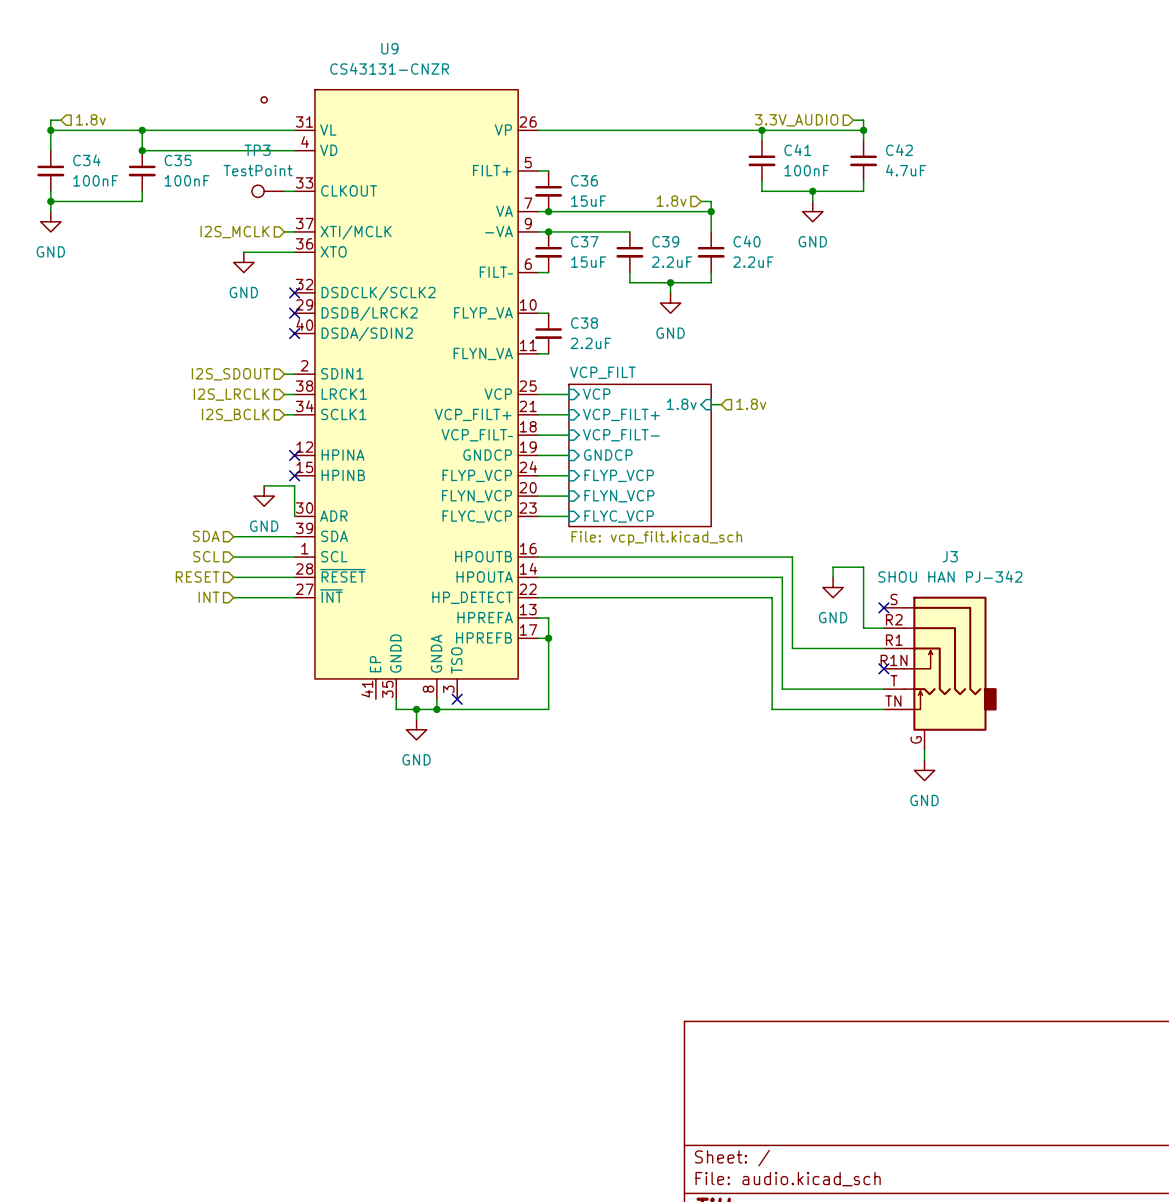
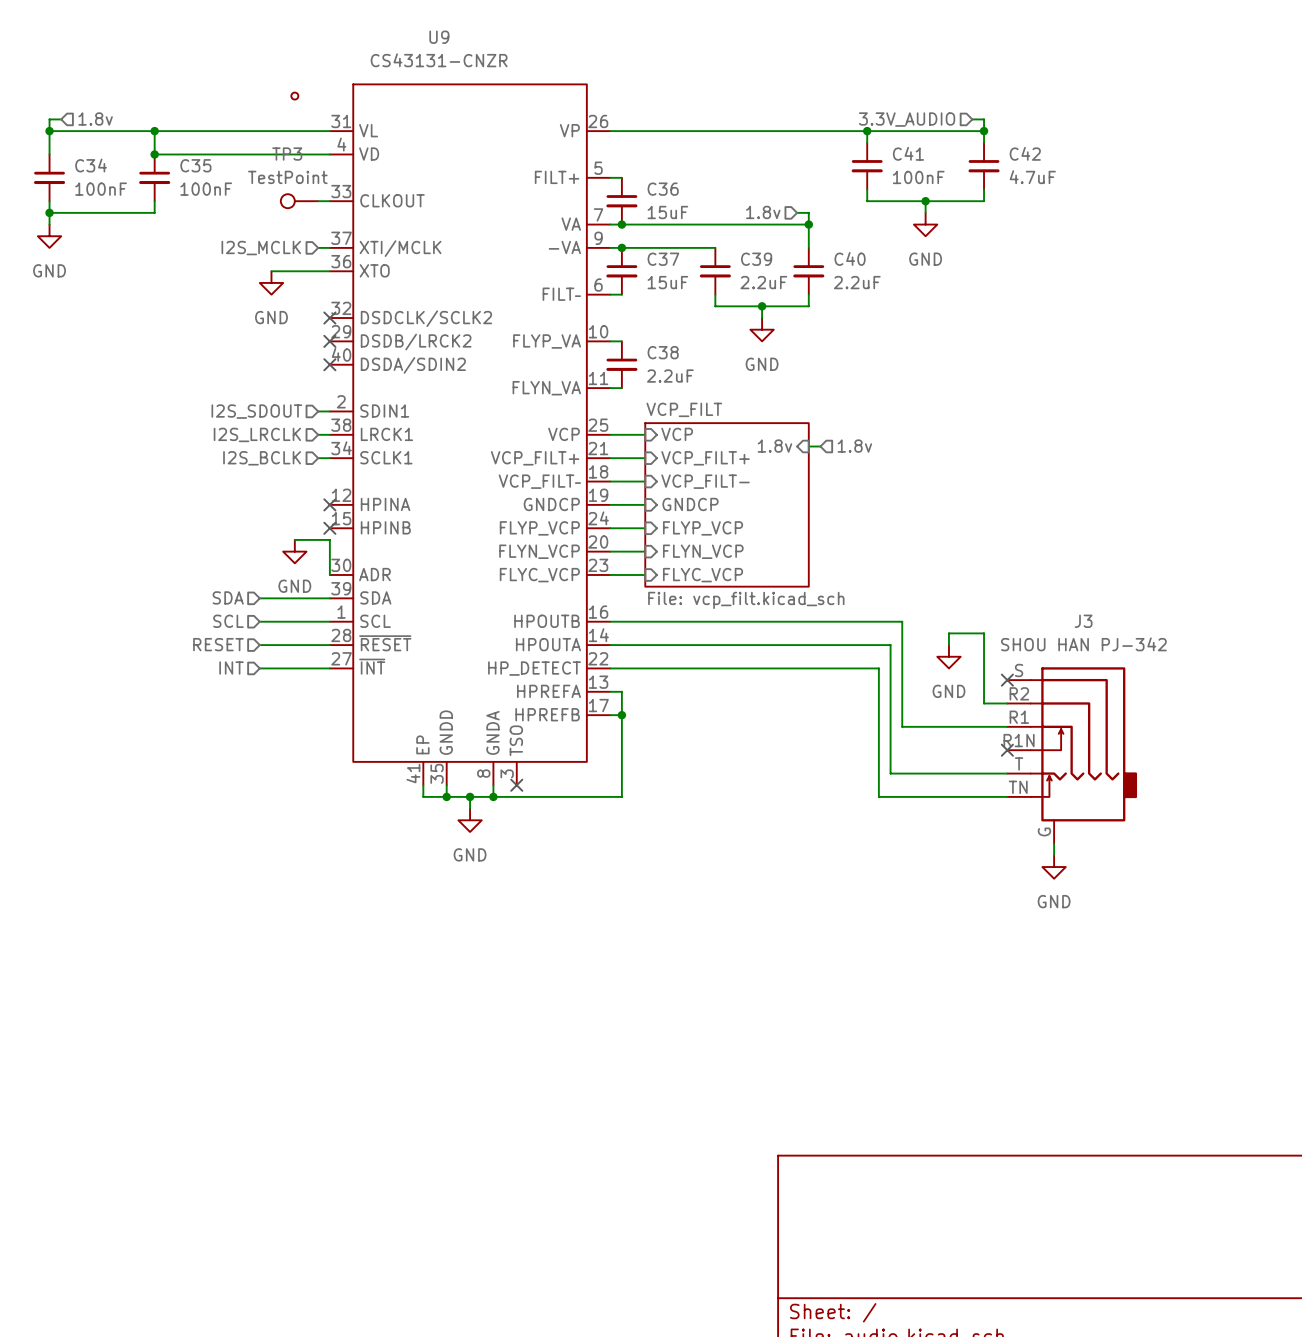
wire: none -> (423, 785) (423, 796) (446, 796)
junction: none -> (446, 796)

